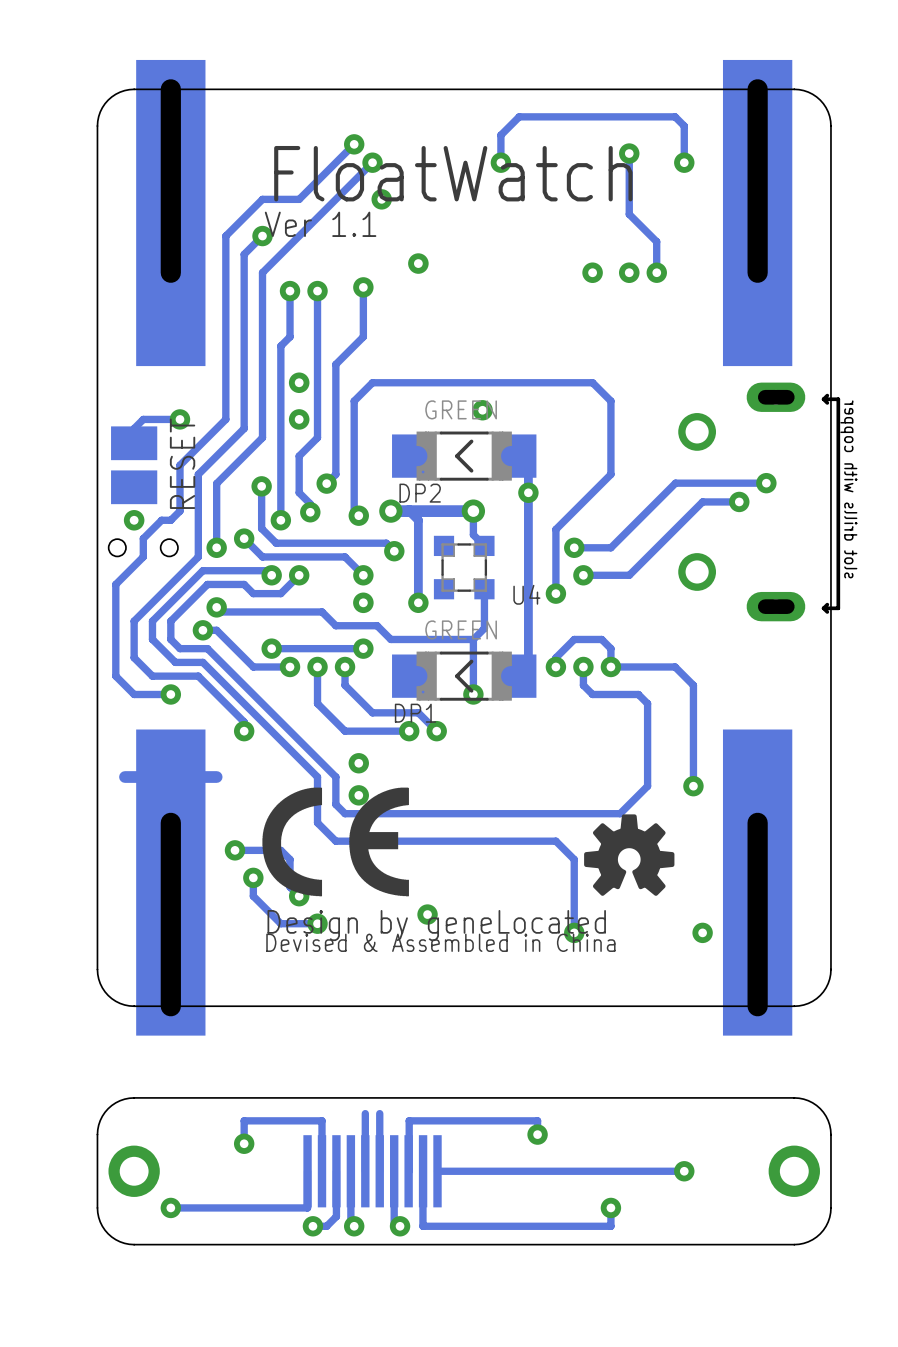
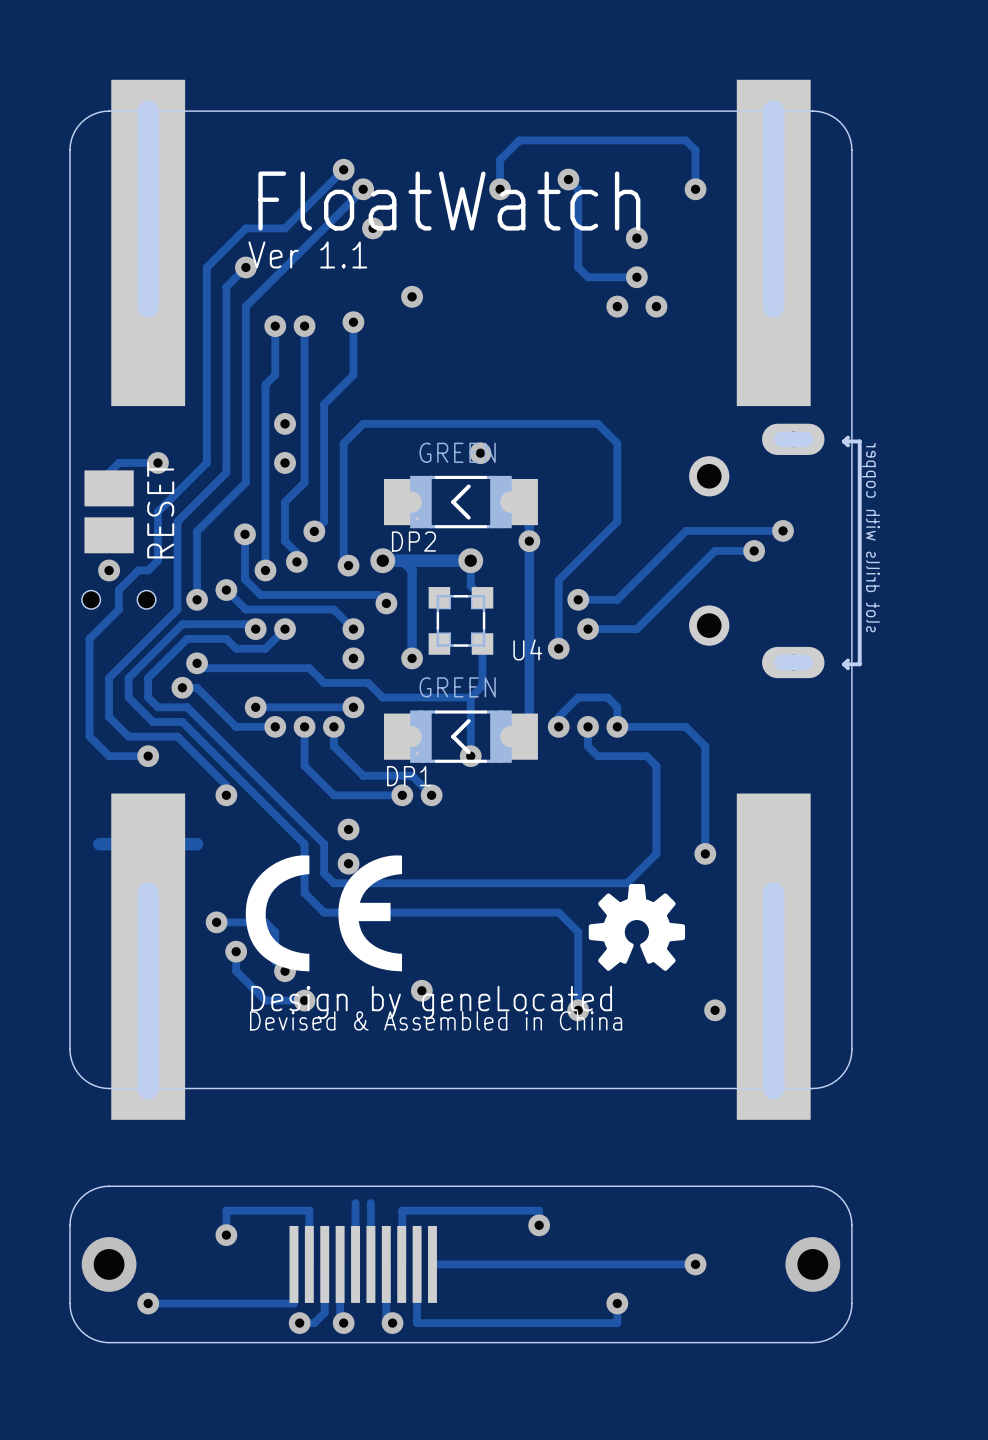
track: none -> (568, 179) (578, 189) (578, 267) (588, 277) (636, 277)
via: none -> (568, 179)
track: (629, 153) (629, 214) (656, 241) (656, 272) -> none
via: (629, 153) -> none
via: none -> (636, 238)
via: (592, 272) -> none
via: none -> (617, 306)
via: (629, 272) -> none
via: none -> (656, 306)
via position: (656, 272) -> (636, 277)

